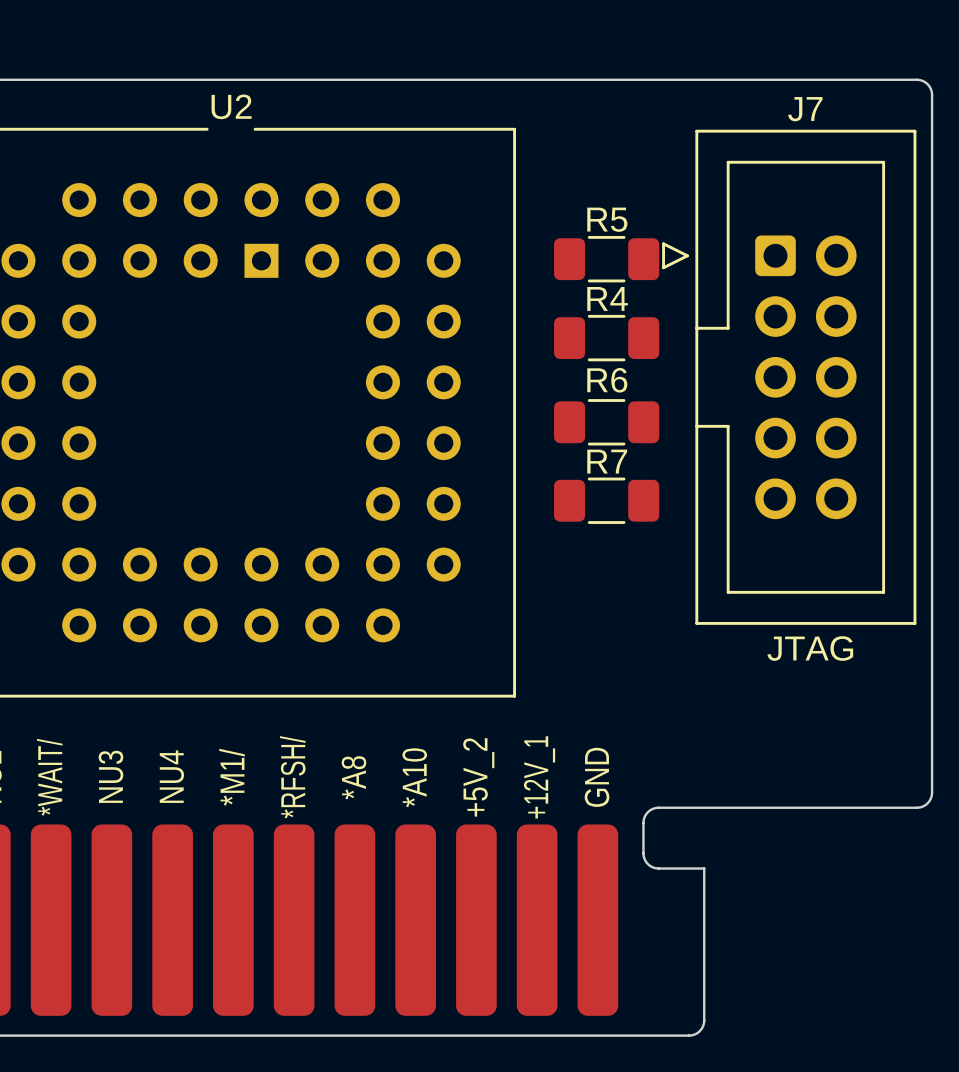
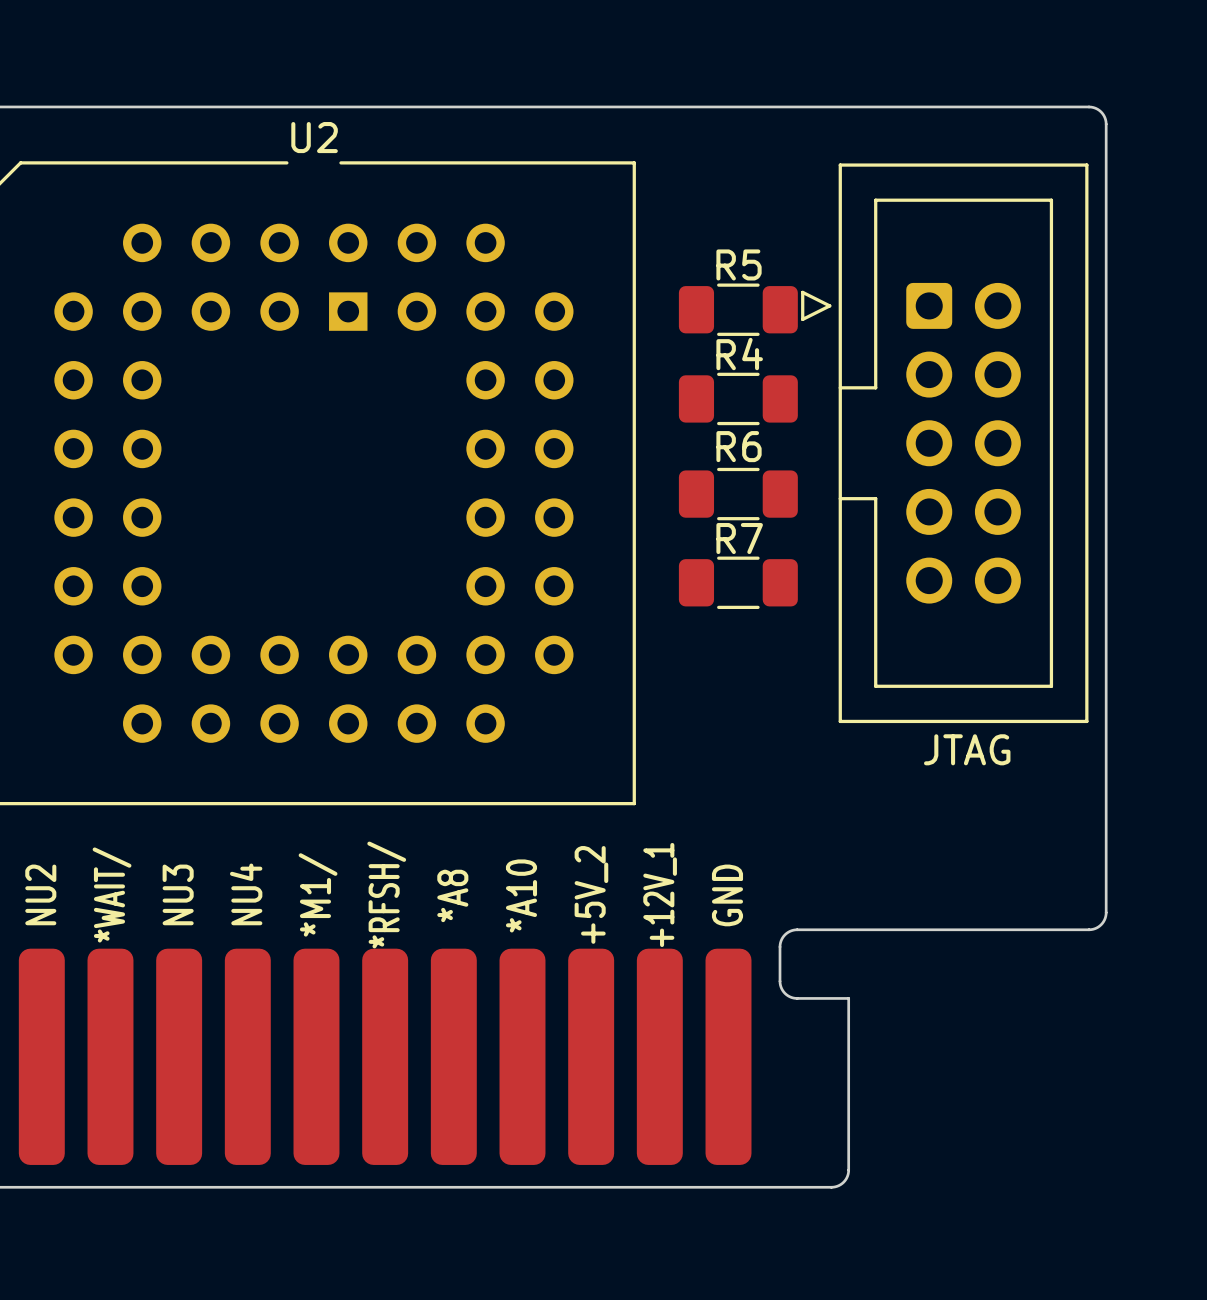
J7 name: J7 (805, 109) -> none

